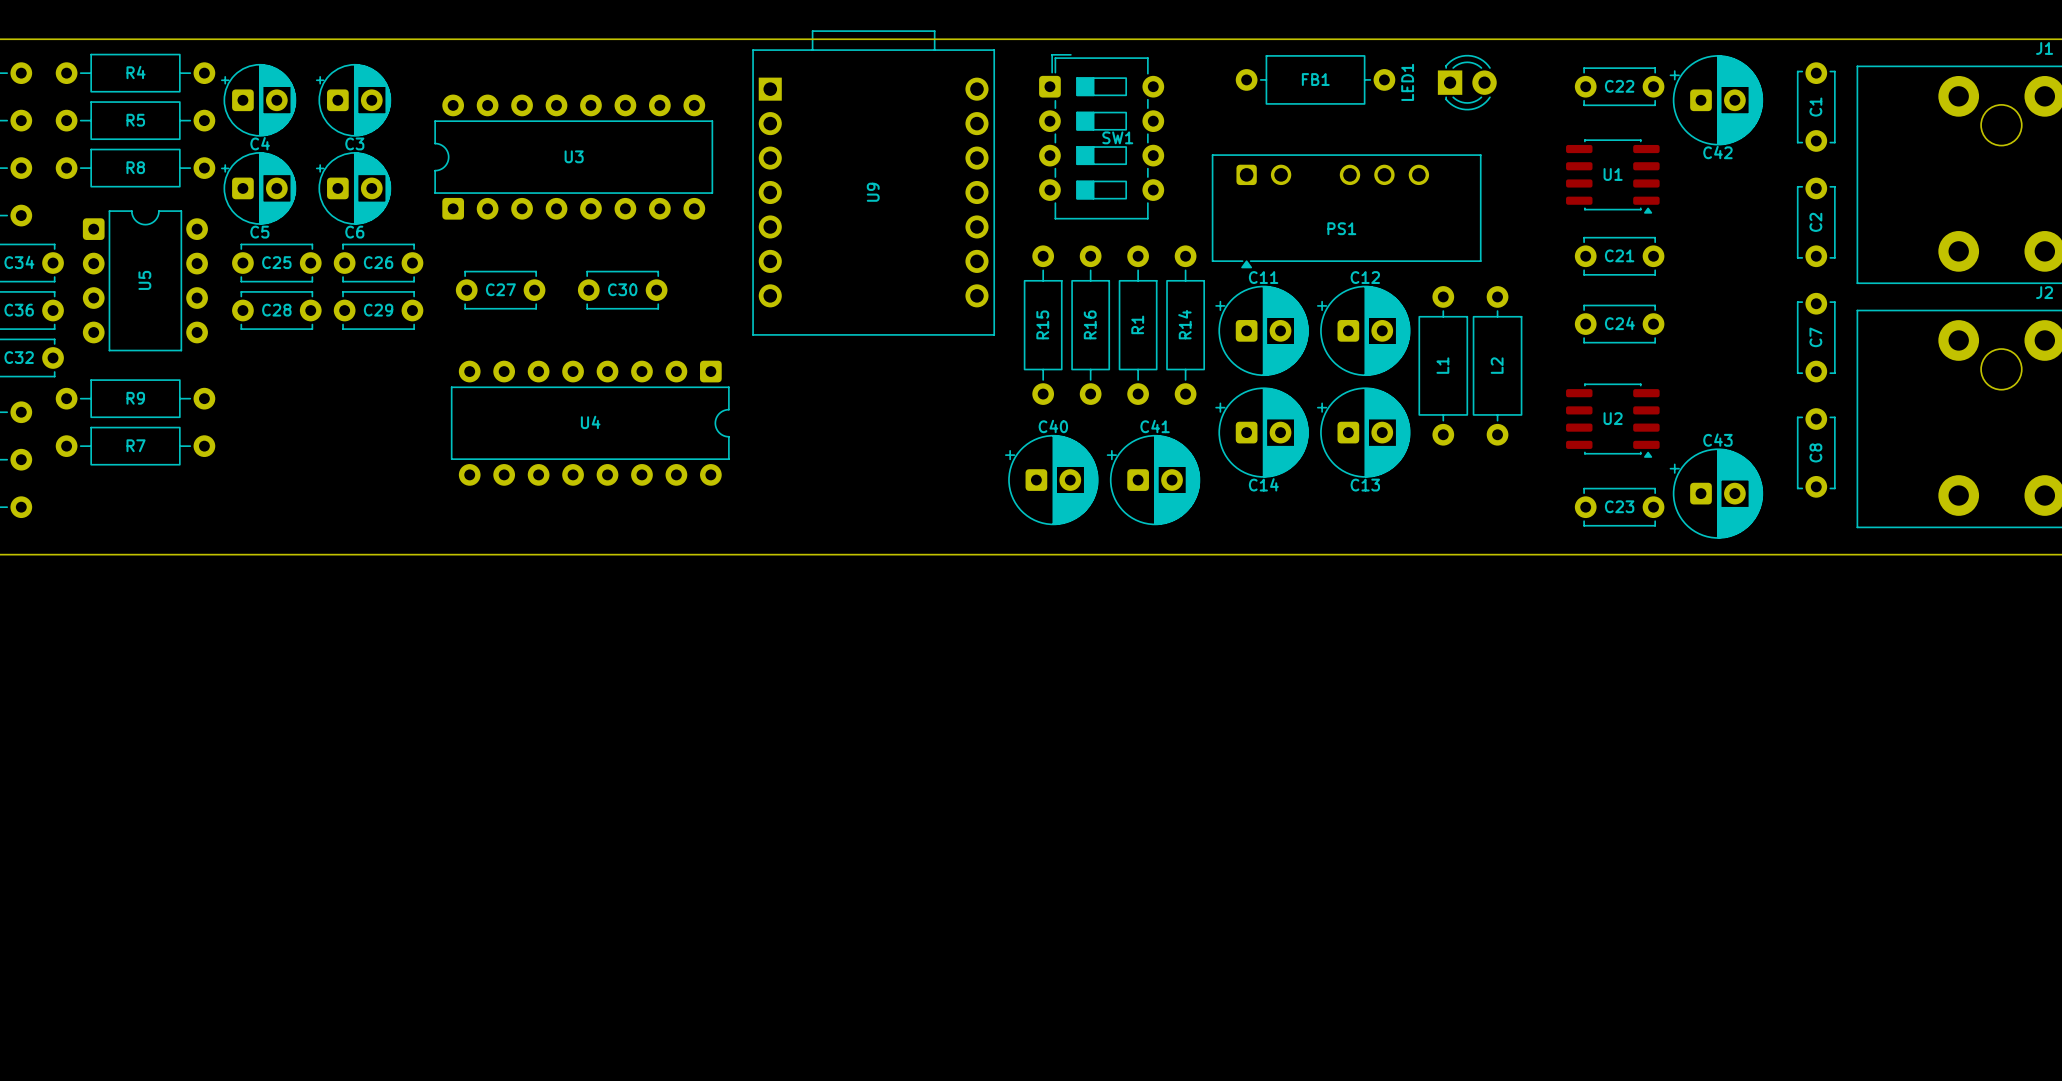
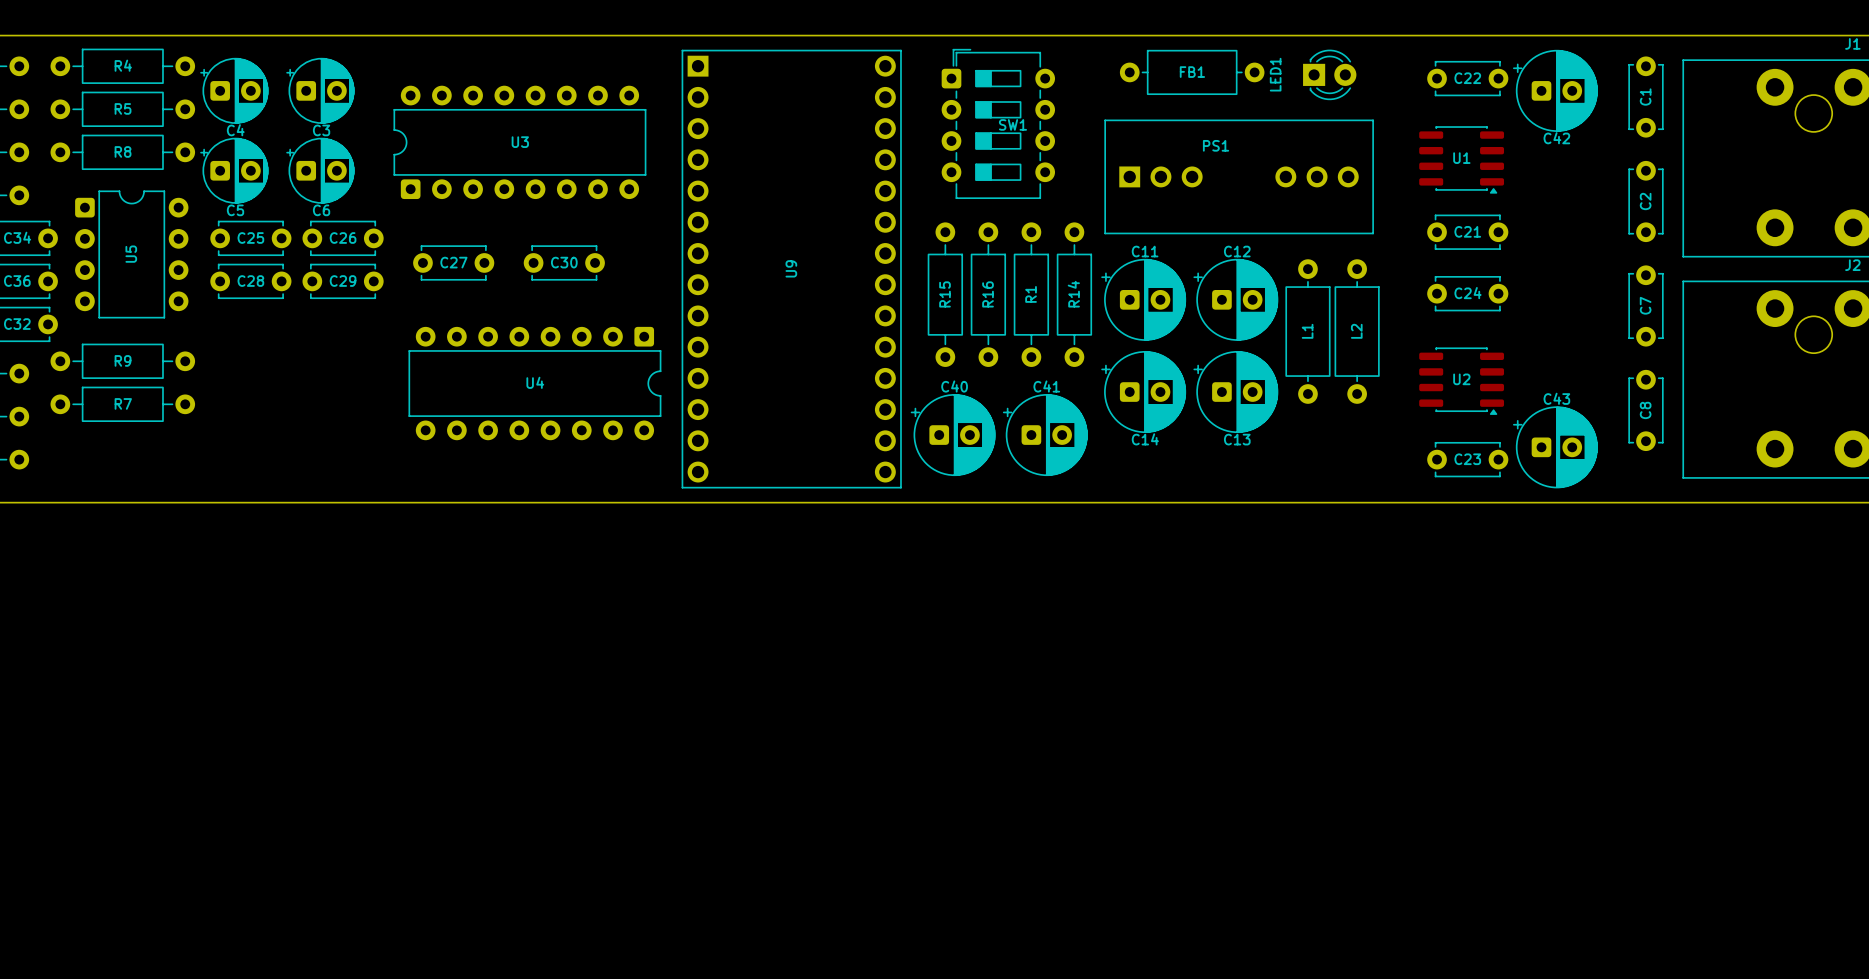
U9 footprint: [752, 30, 996, 336] -> [681, 49, 902, 489]
PS1 footprint: [1211, 154, 1482, 269] -> [1104, 119, 1374, 235]
PS1 name position: PS1 (1341, 228) -> PS1 (1216, 145)

